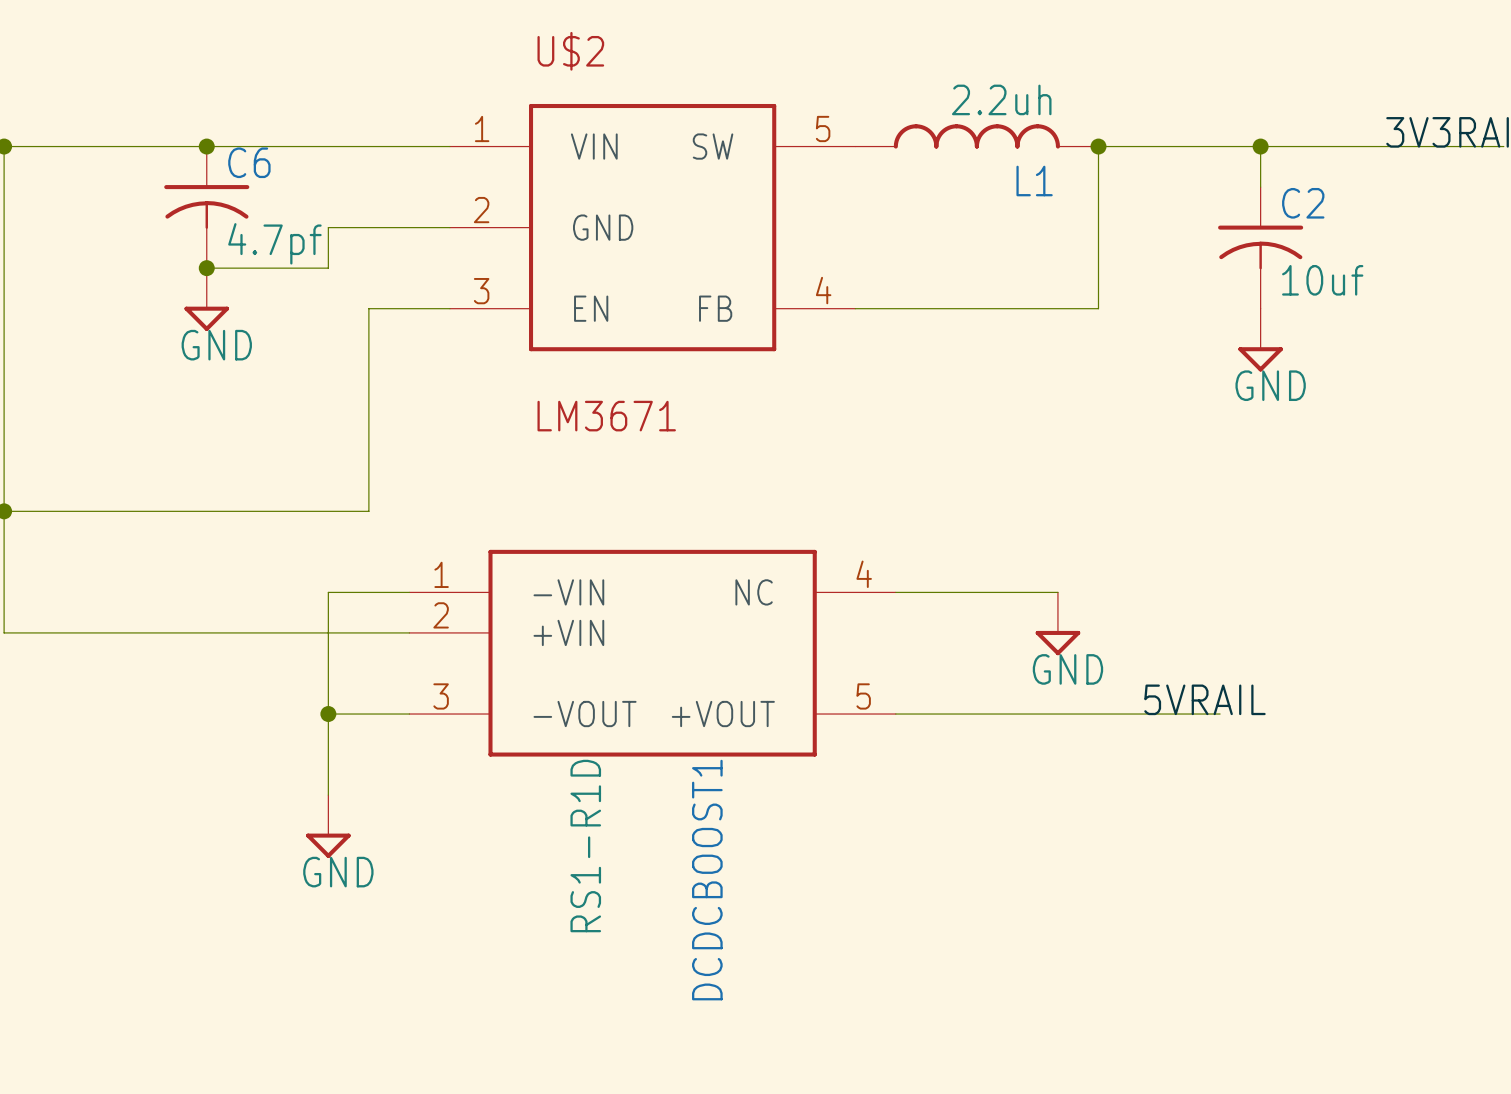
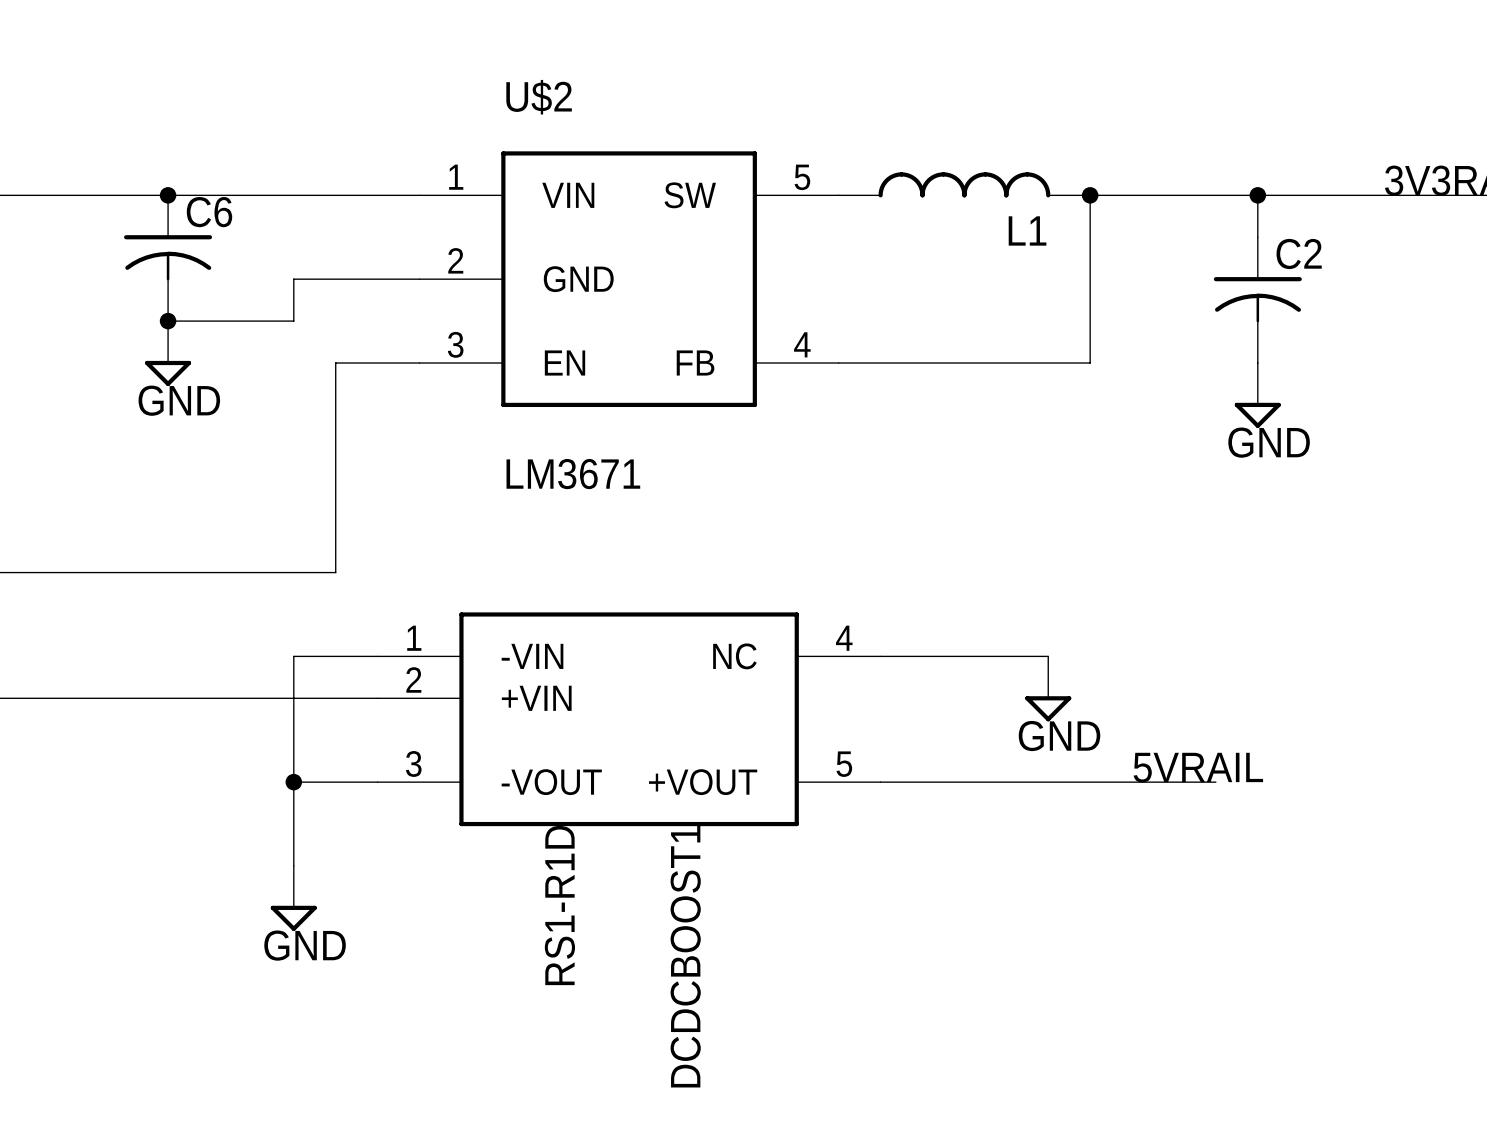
L1 value: 2.2uh (1001, 99) -> none
C6 value: 4.7pf (274, 243) -> none
C2 value: 10uf (1322, 280) -> none

